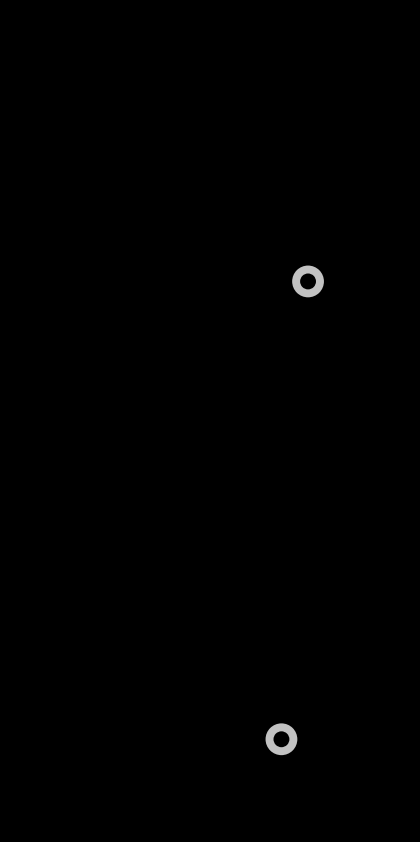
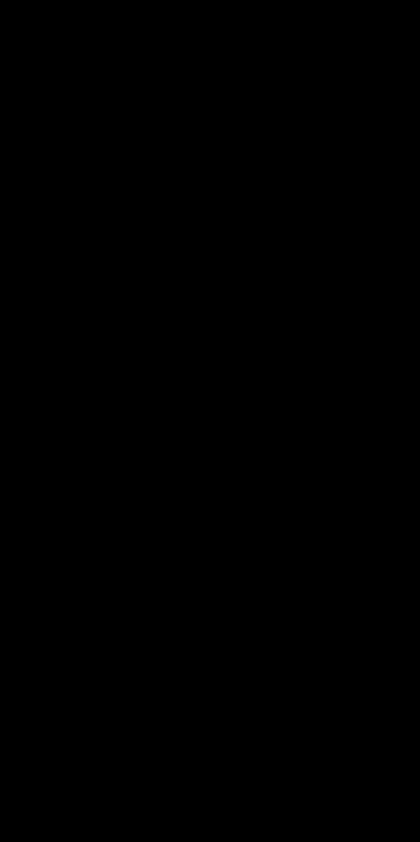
via: (308, 281) -> none
via: (281, 739) -> none

